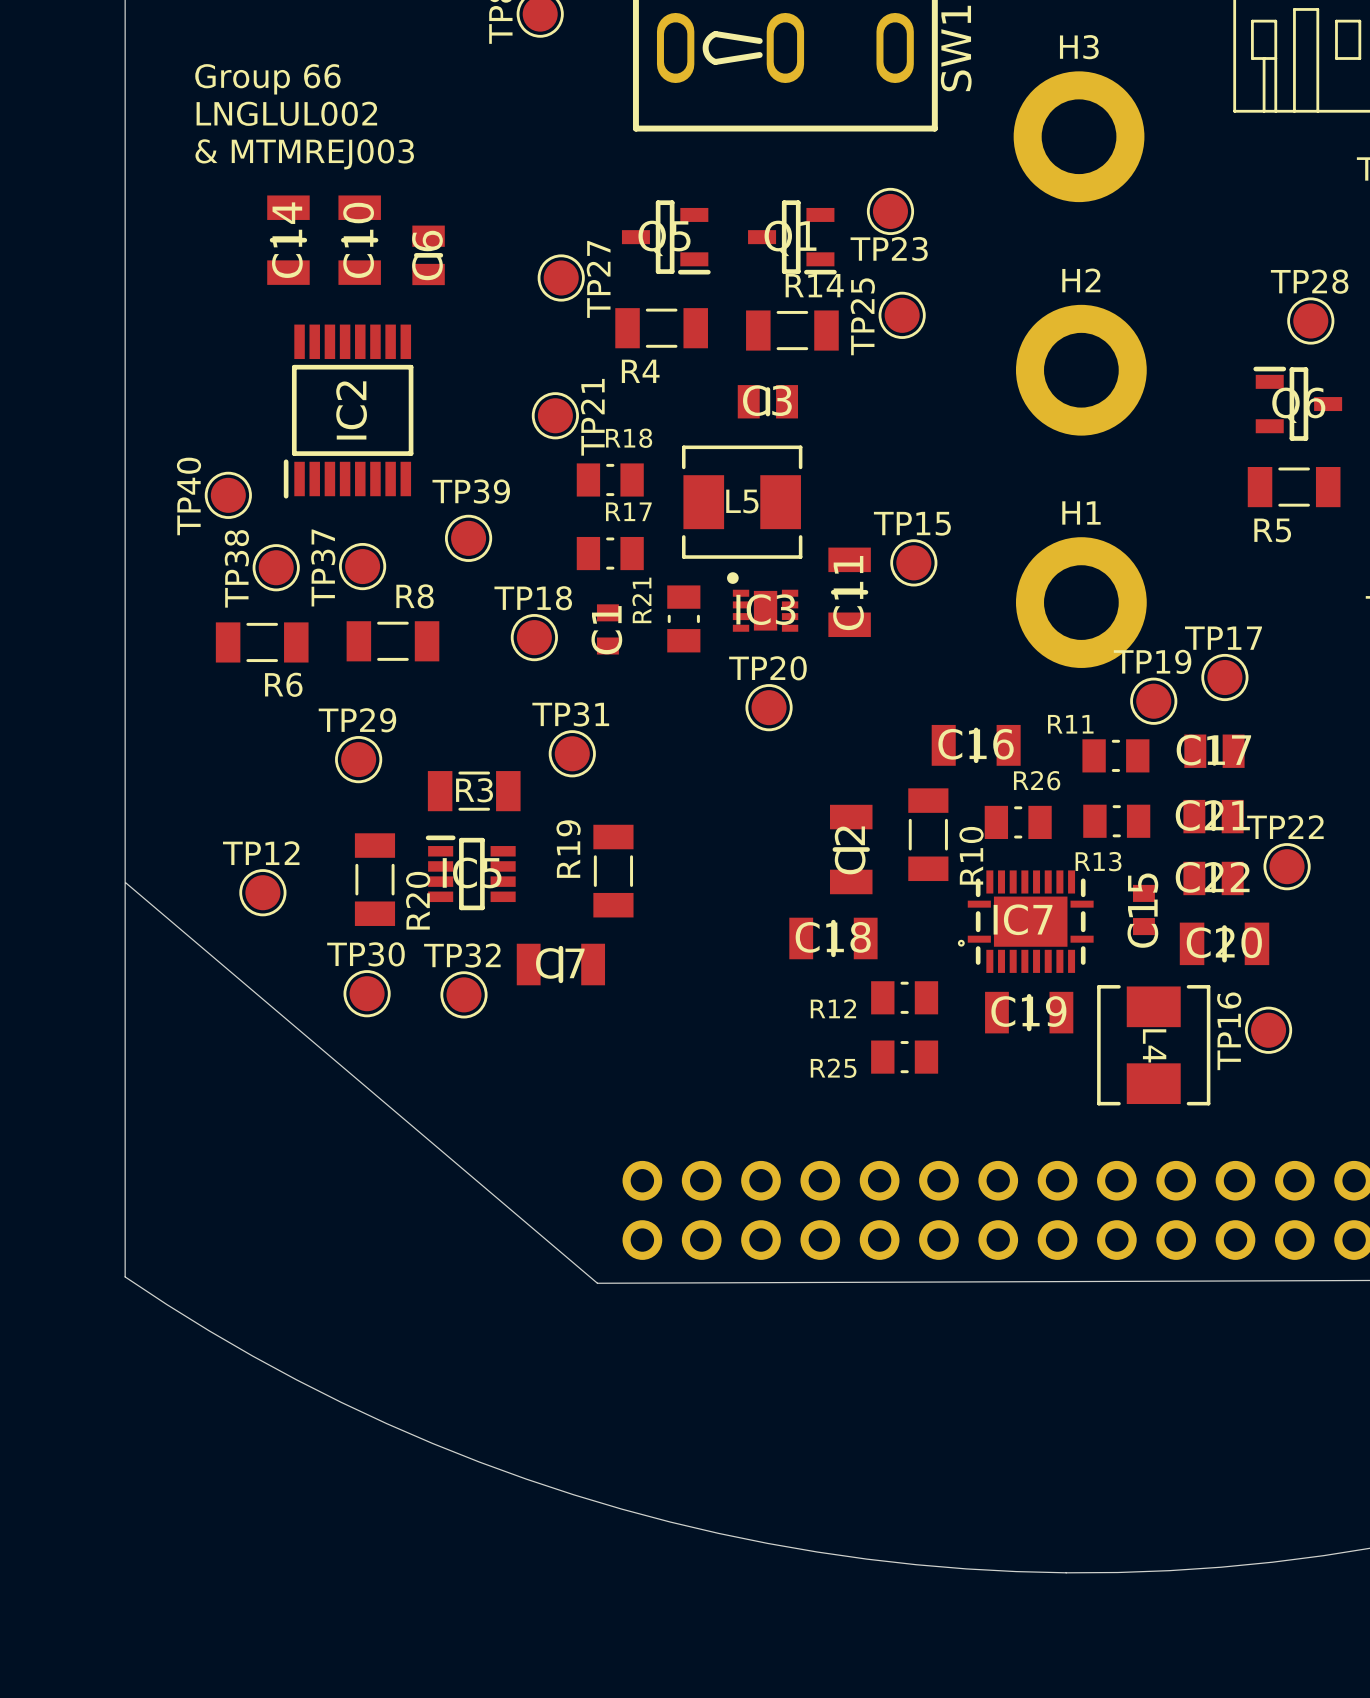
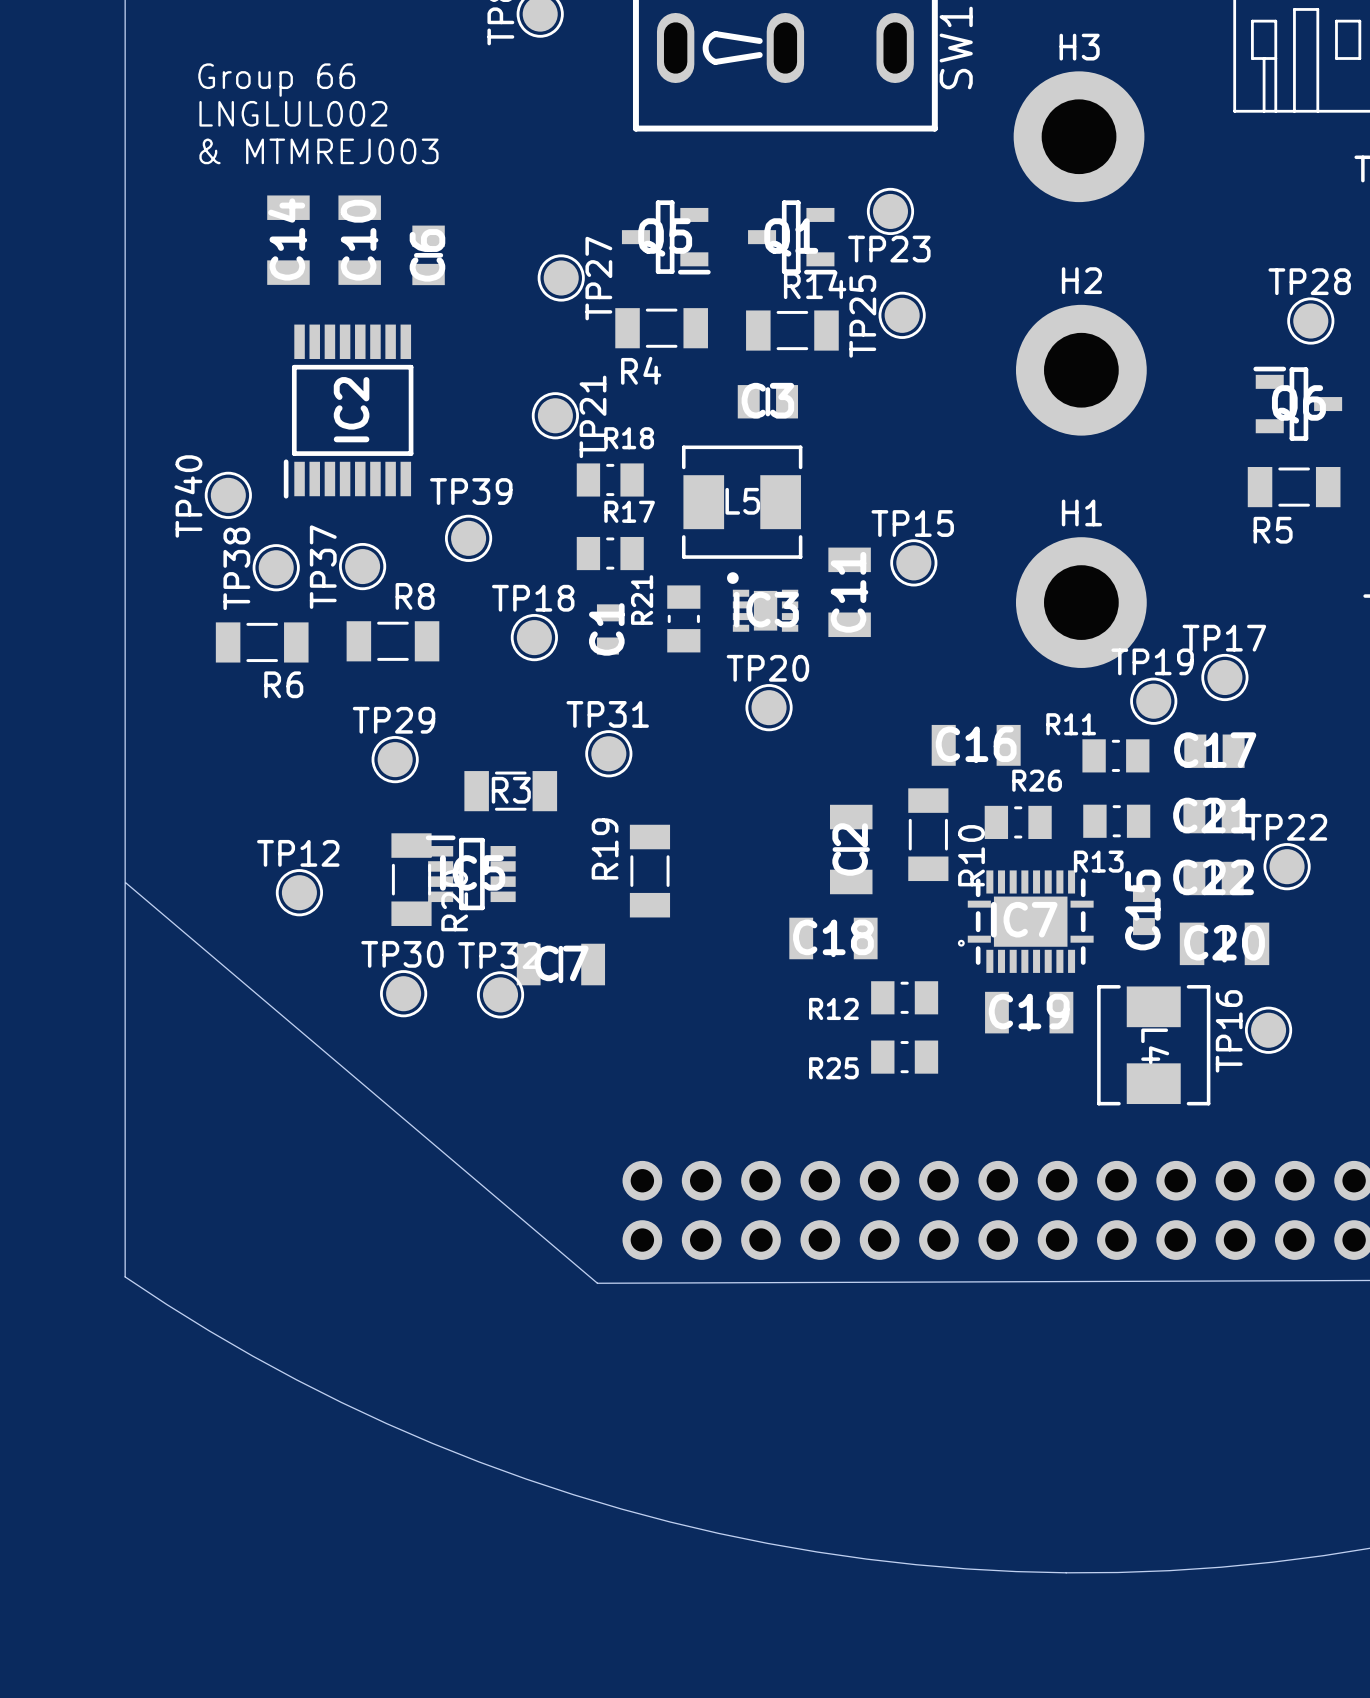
TP31 position: (572, 753) -> (608, 753)
TP29 position: (358, 759) -> (395, 759)
R3 position: (474, 791) -> (510, 791)
R19 position: (613, 871) -> (649, 871)
R20 position: (374, 879) -> (411, 879)
TP12 position: (262, 892) -> (299, 892)
TP30 position: (367, 993) -> (403, 993)
TP32 position: (463, 994) -> (500, 994)

